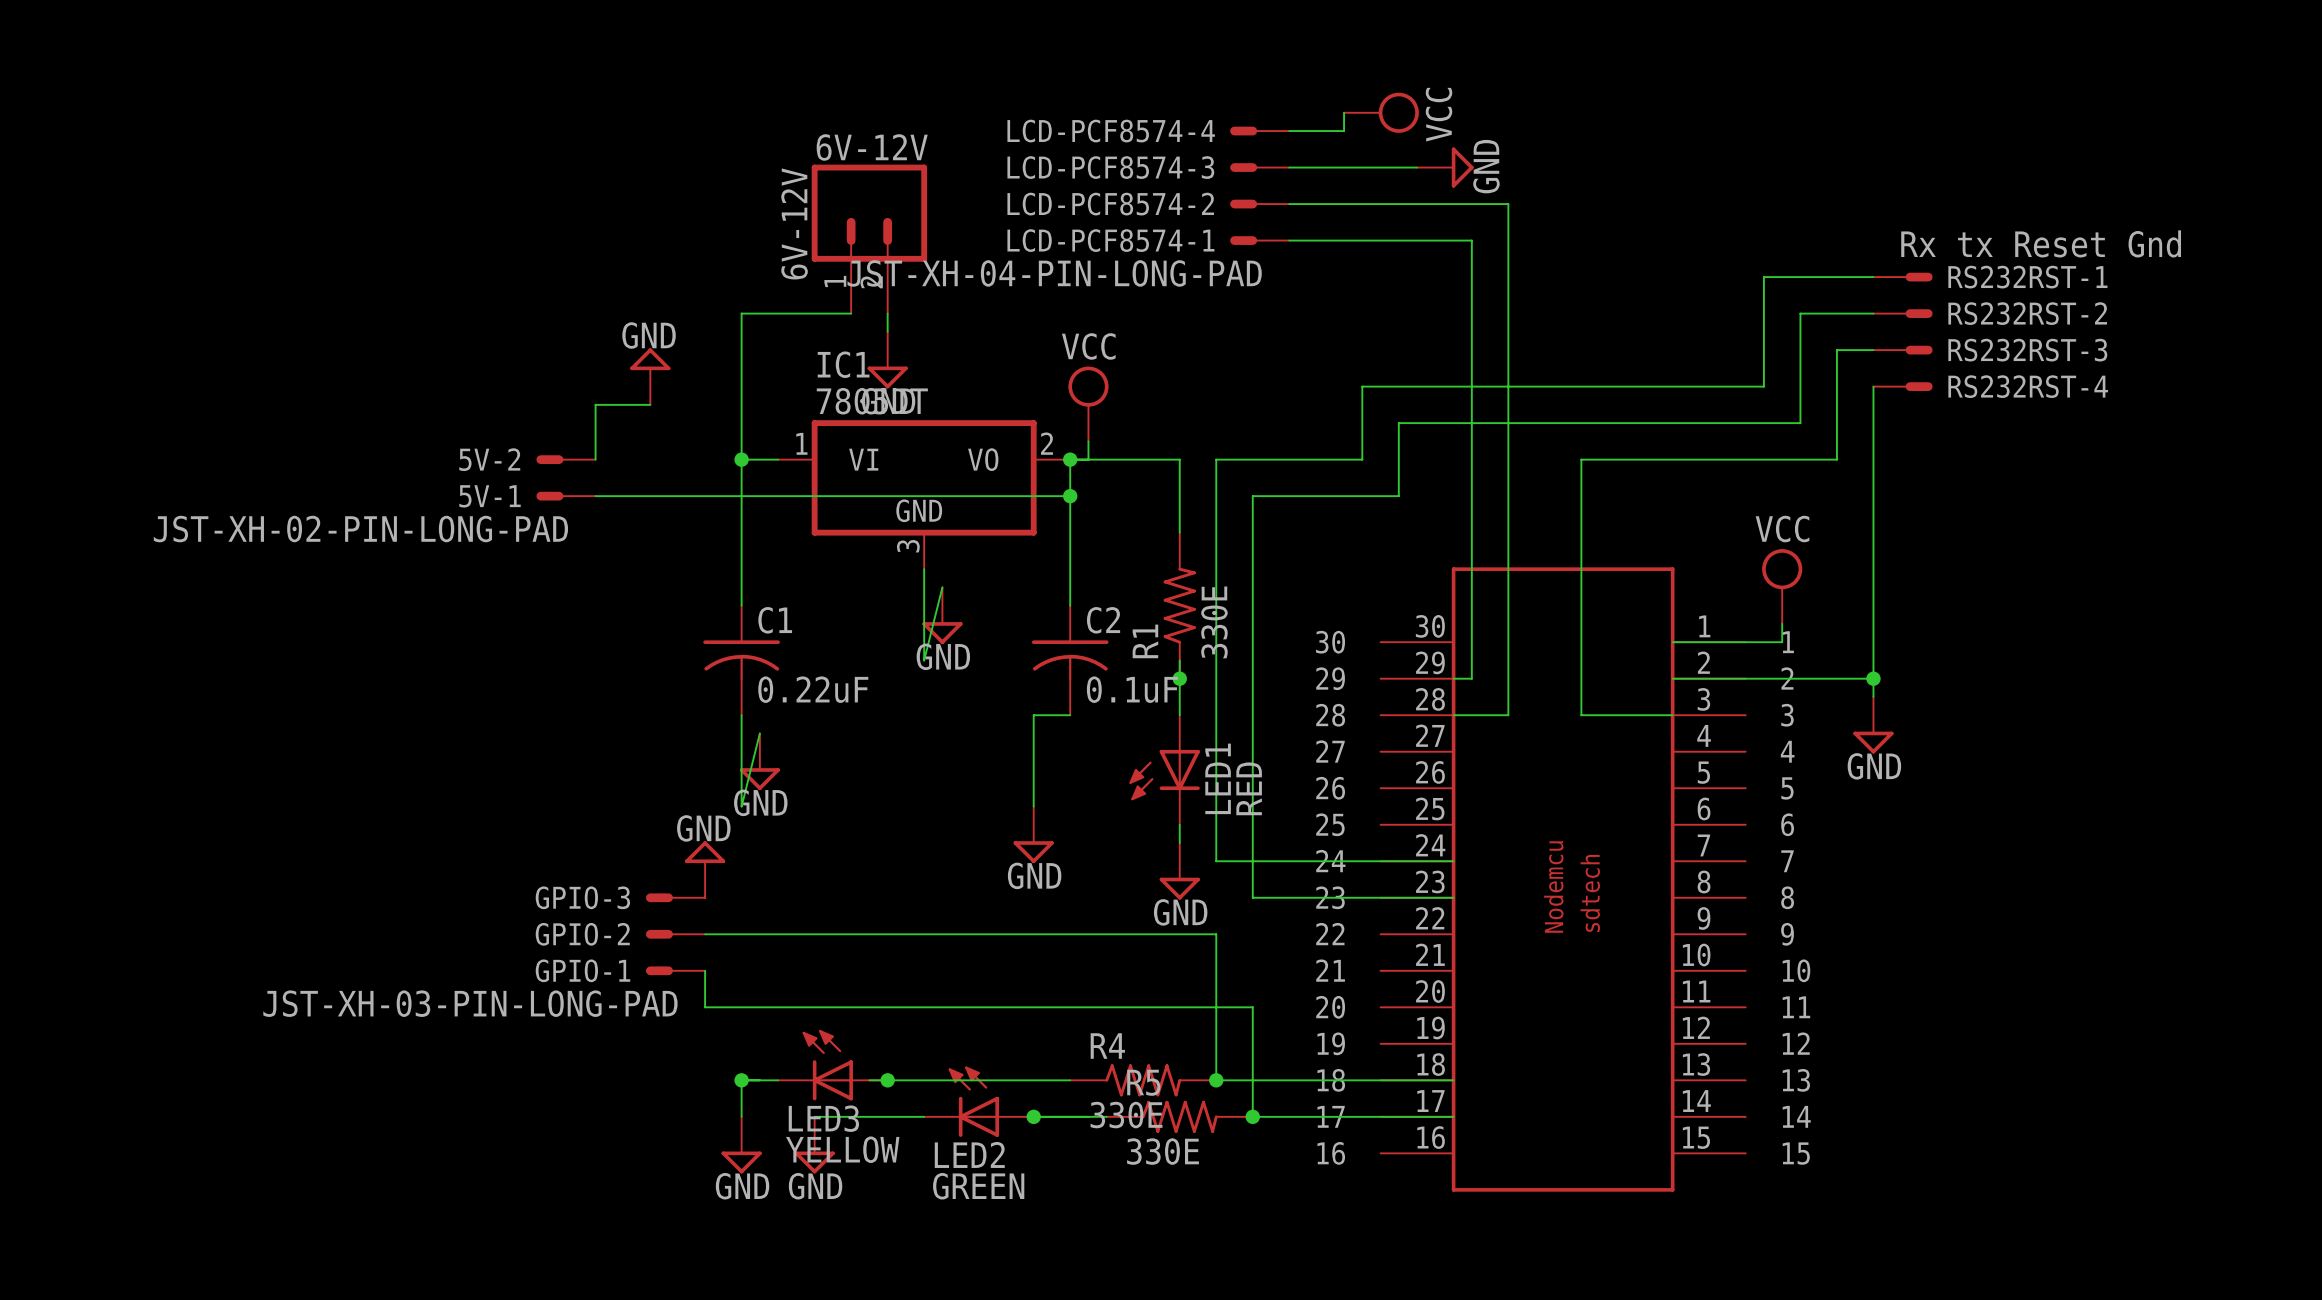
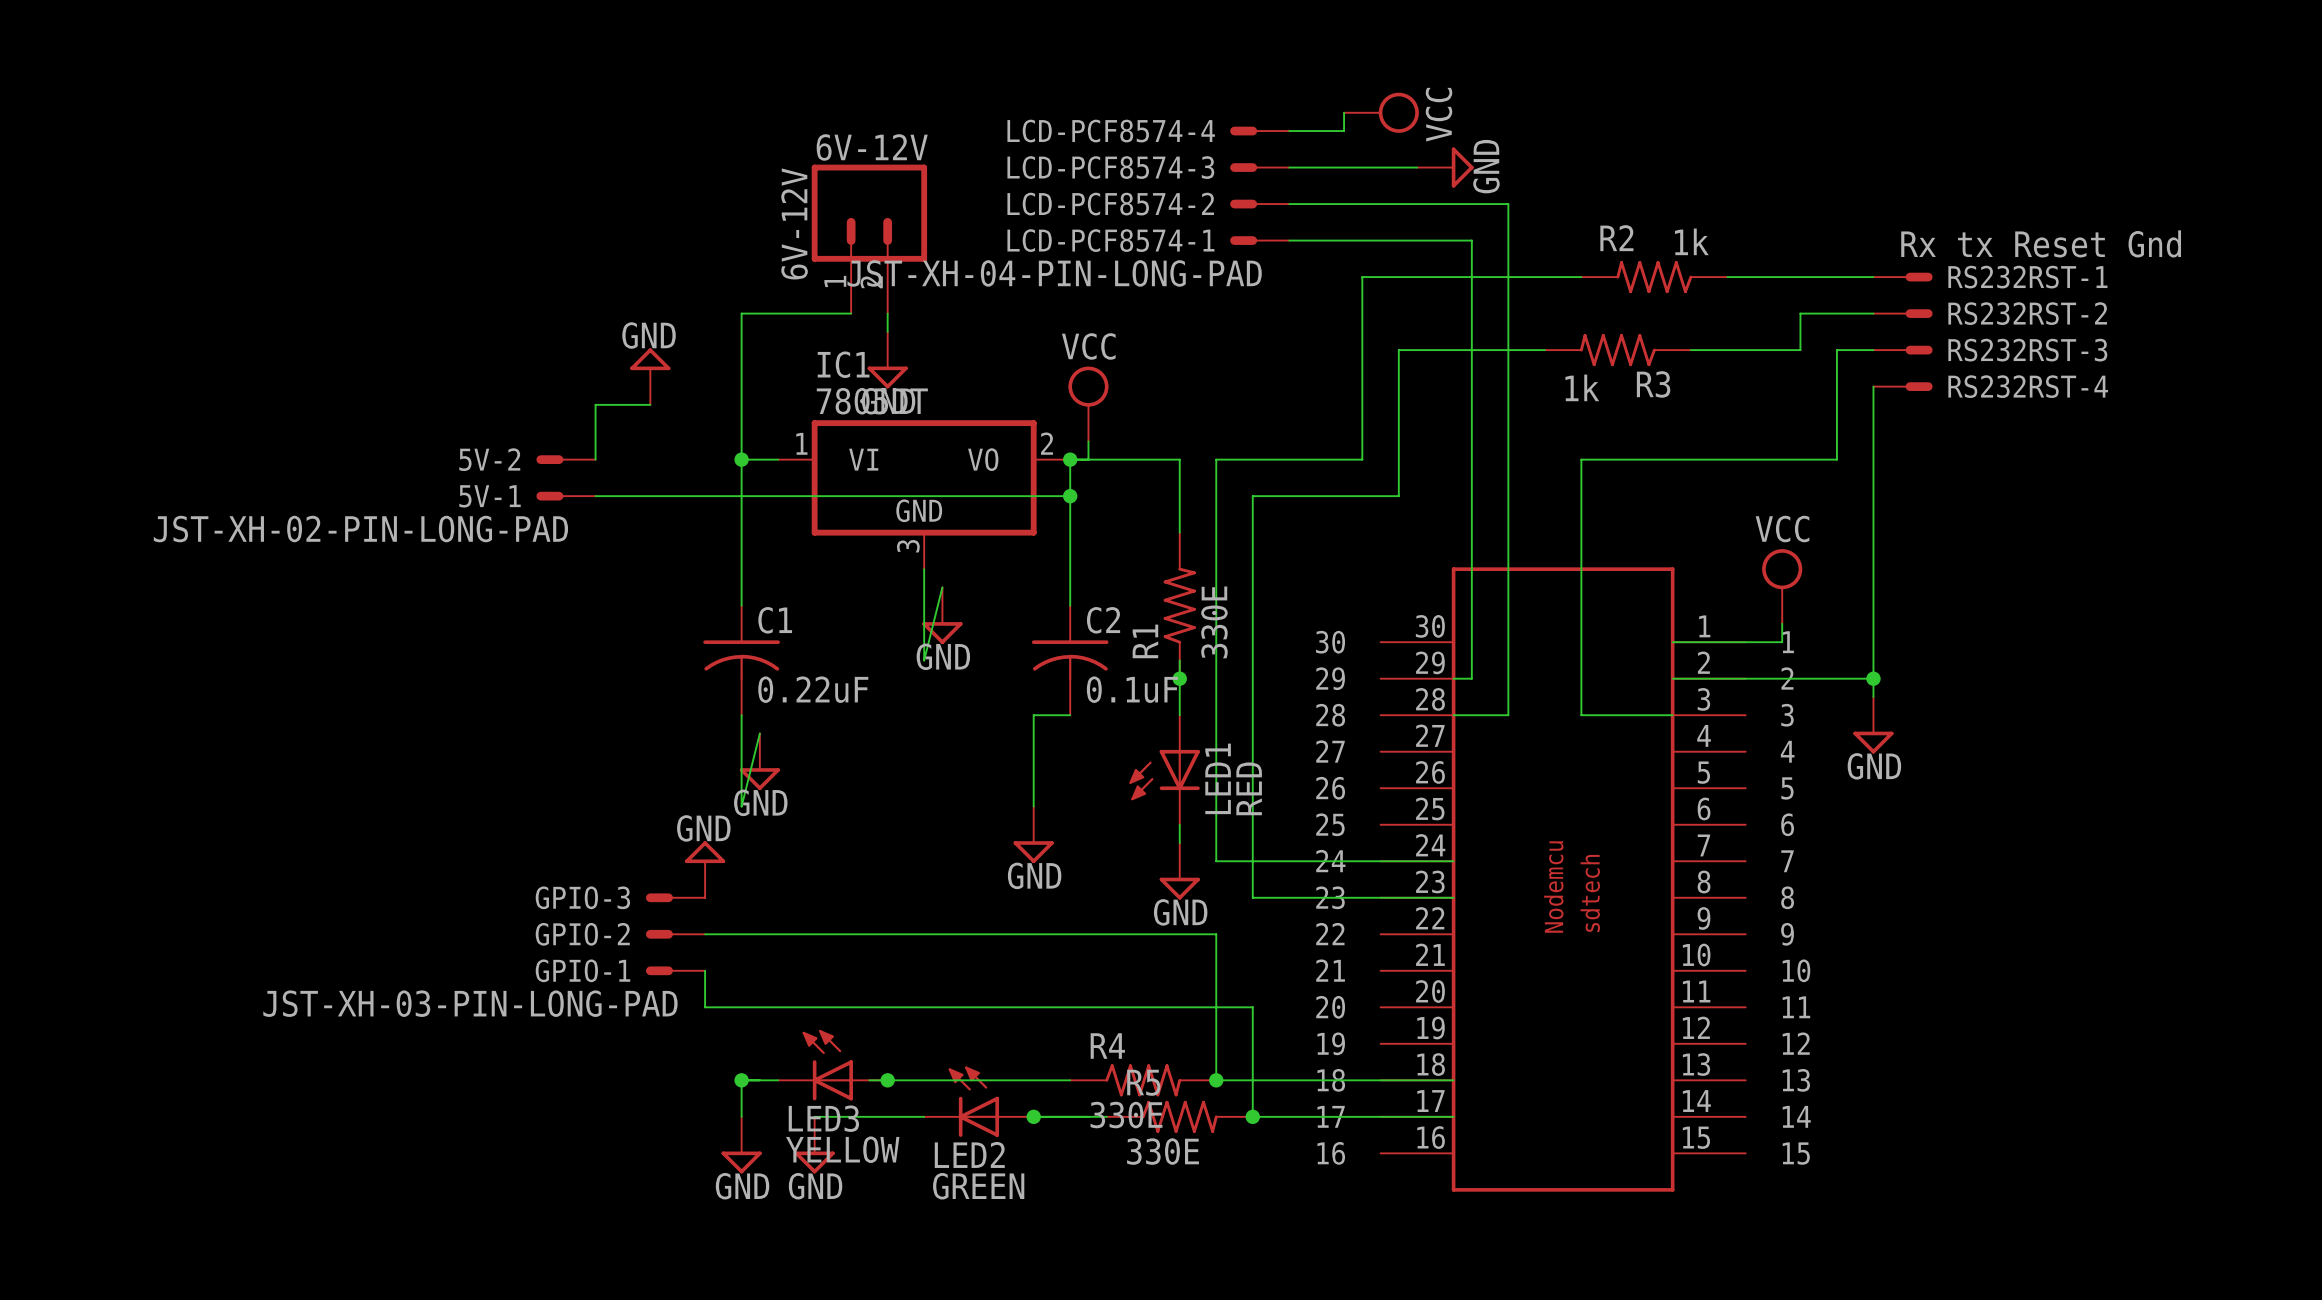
R2: none -> 1k (1654, 277)
wire: none -> (1727, 277) (1763, 277)
wire: (1763, 277) (1763, 386) (1362, 386) -> (1581, 277) (1362, 277) (1362, 386)
R3: none -> 1k (1617, 350)
wire: none -> (1690, 350) (1800, 350)
wire: (1800, 350) (1800, 423) (1398, 423) -> (1544, 350) (1398, 350) (1398, 423)

